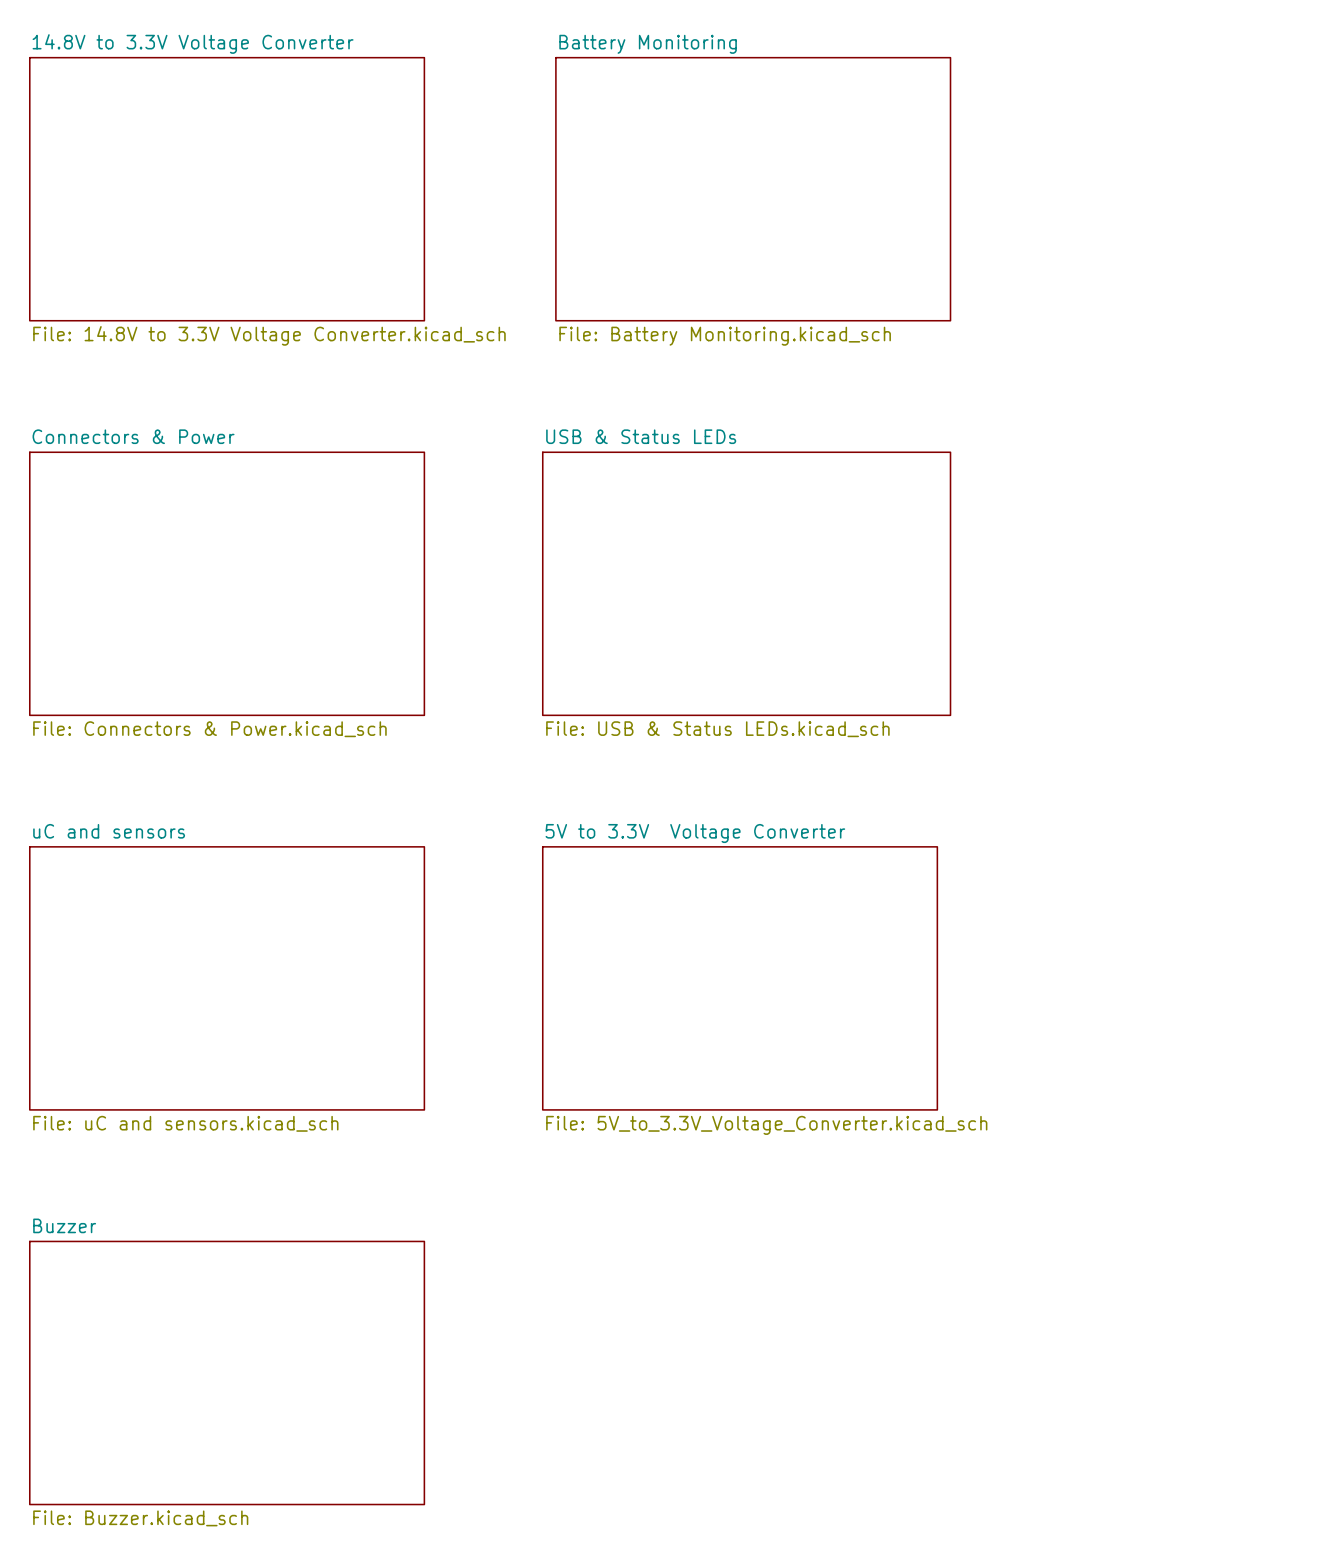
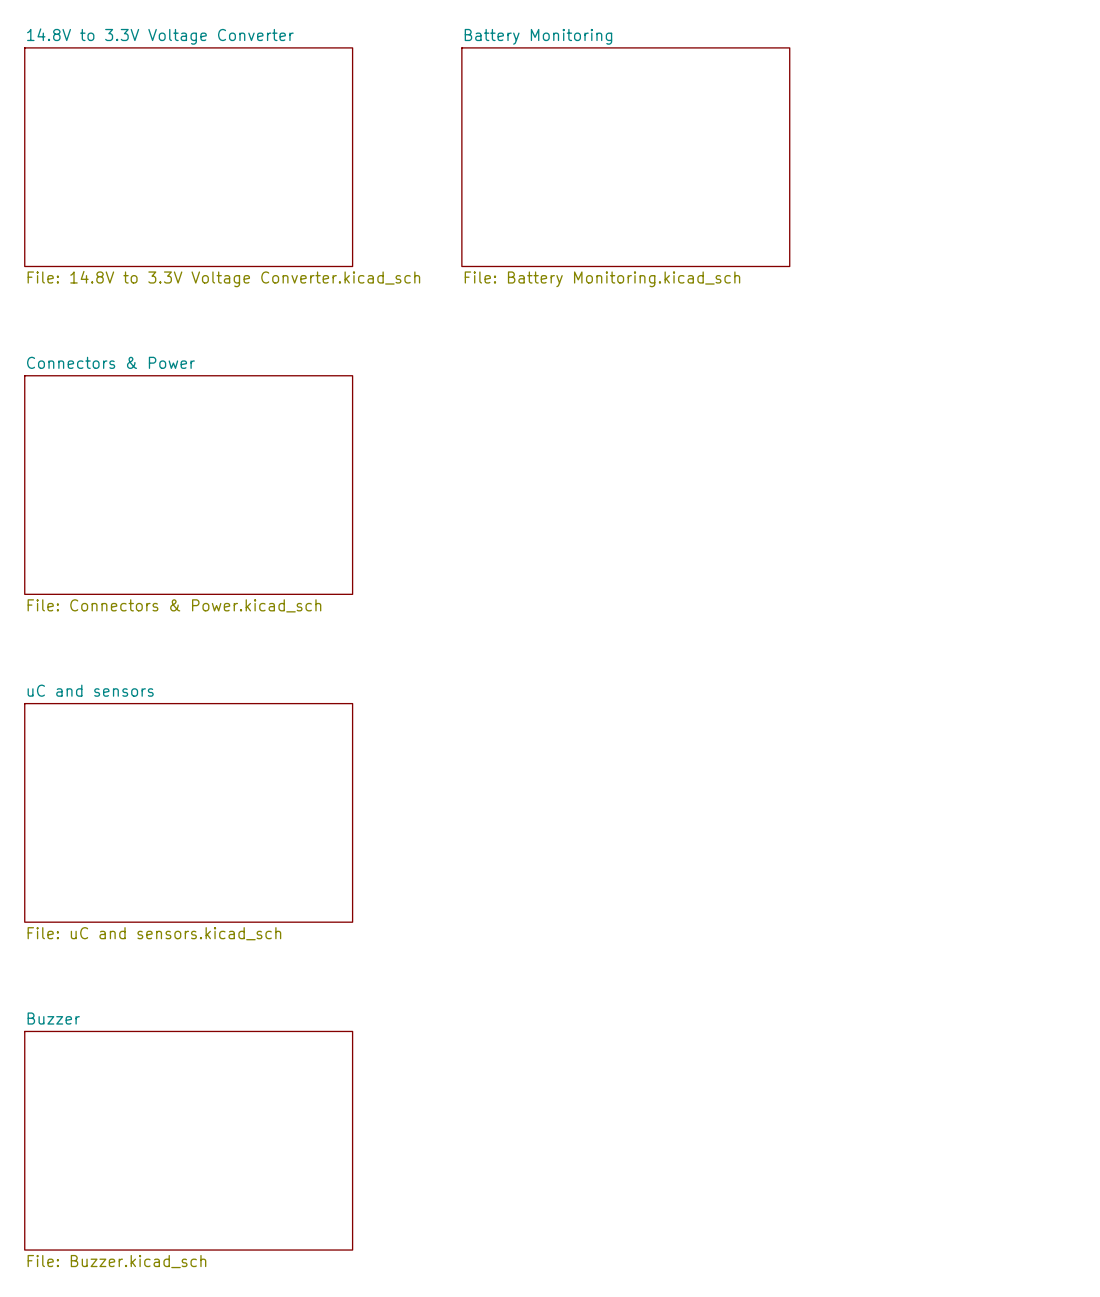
sheet USB & Status LEDs: File: USB & Status LEDs.kicad_sch (746, 583) -> none
sheet 5V to 3.3V Voltage Converter: File: 5V_to_3.3V_Voltage_Converter.kicad_sch (740, 978) -> none

